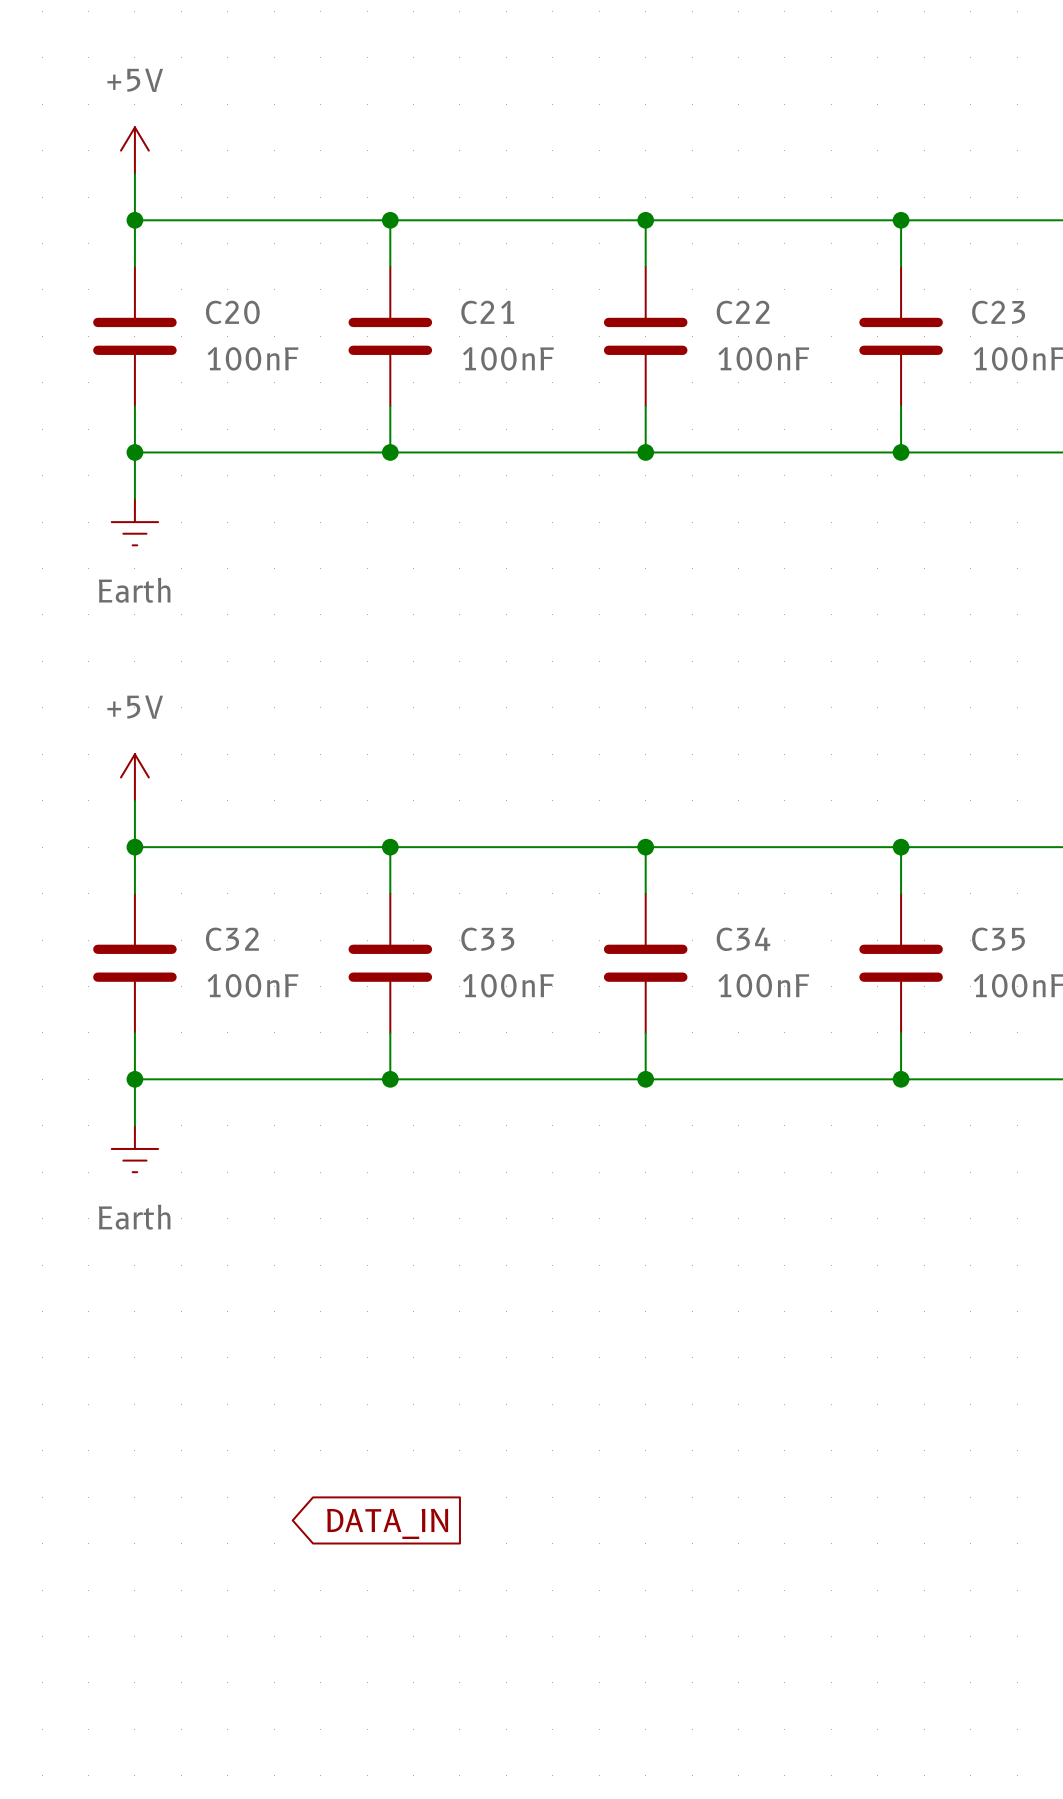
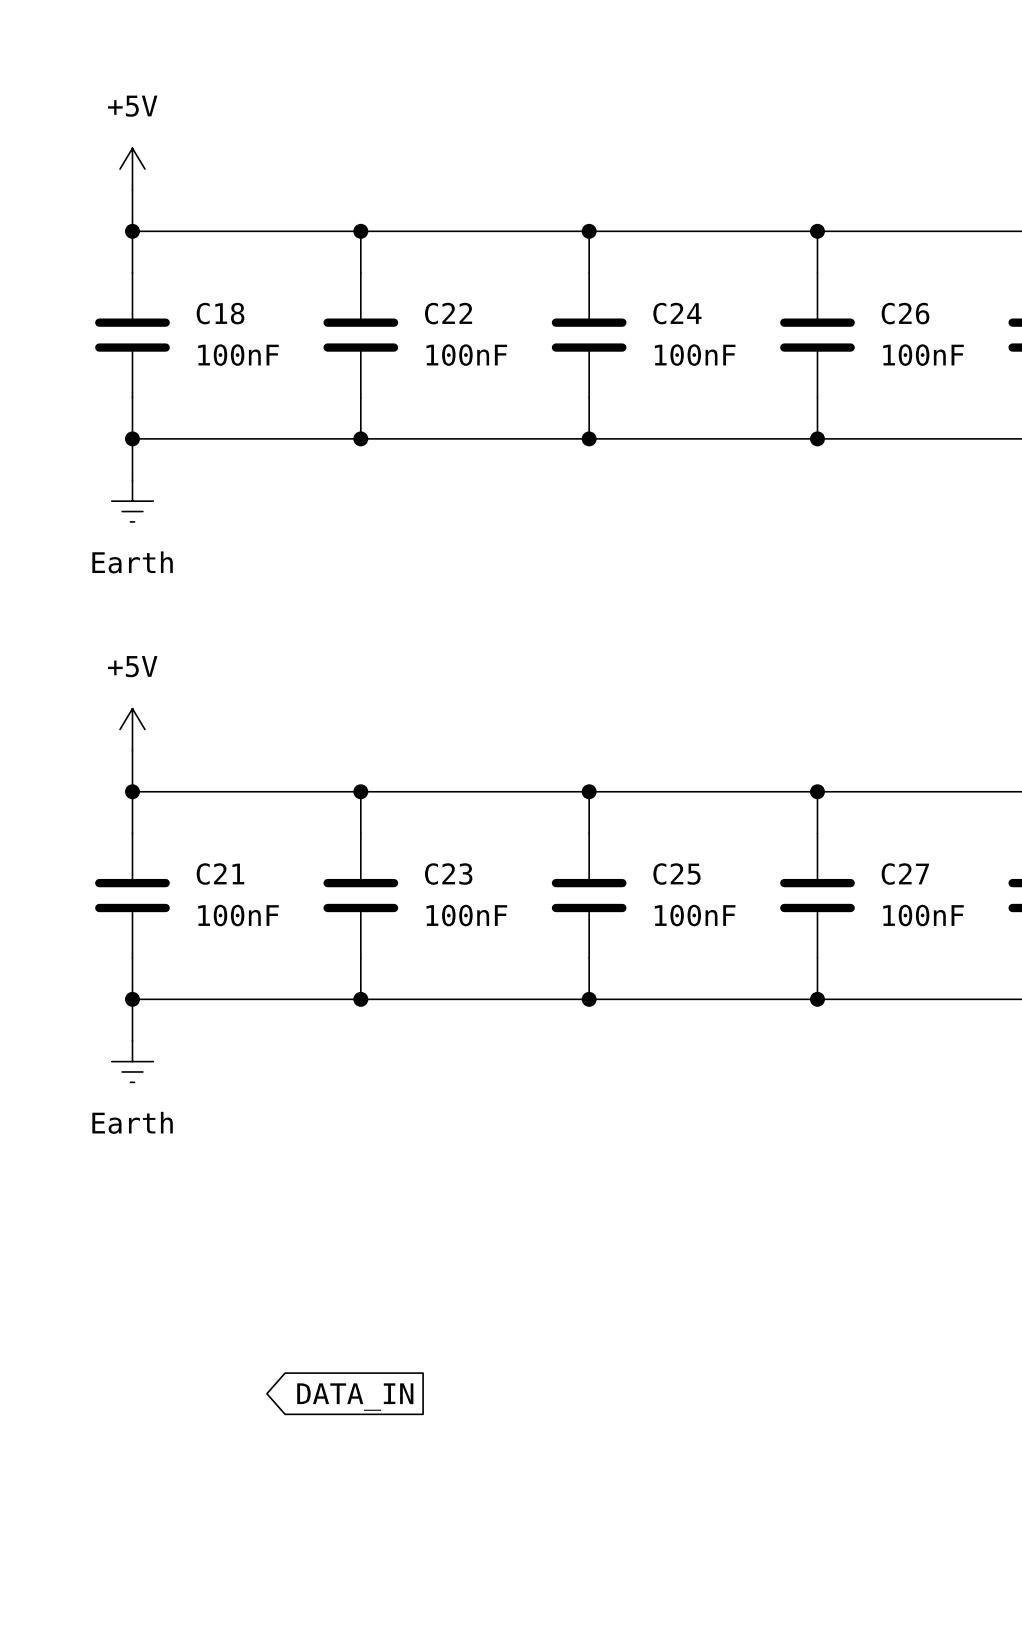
C20 name: C20 (232, 312) -> C18 (220, 313)
C21 name: C21 (487, 312) -> C22 (448, 313)
C22 name: C22 (743, 312) -> C24 (677, 313)
C23 name: C23 (998, 312) -> C26 (905, 313)
C32 name: C32 (232, 939) -> C21 (220, 874)
C33 name: C33 (487, 939) -> C23 (448, 874)
C34 name: C34 (743, 939) -> C25 (676, 874)
C35 name: C35 (998, 939) -> C27 (905, 874)

